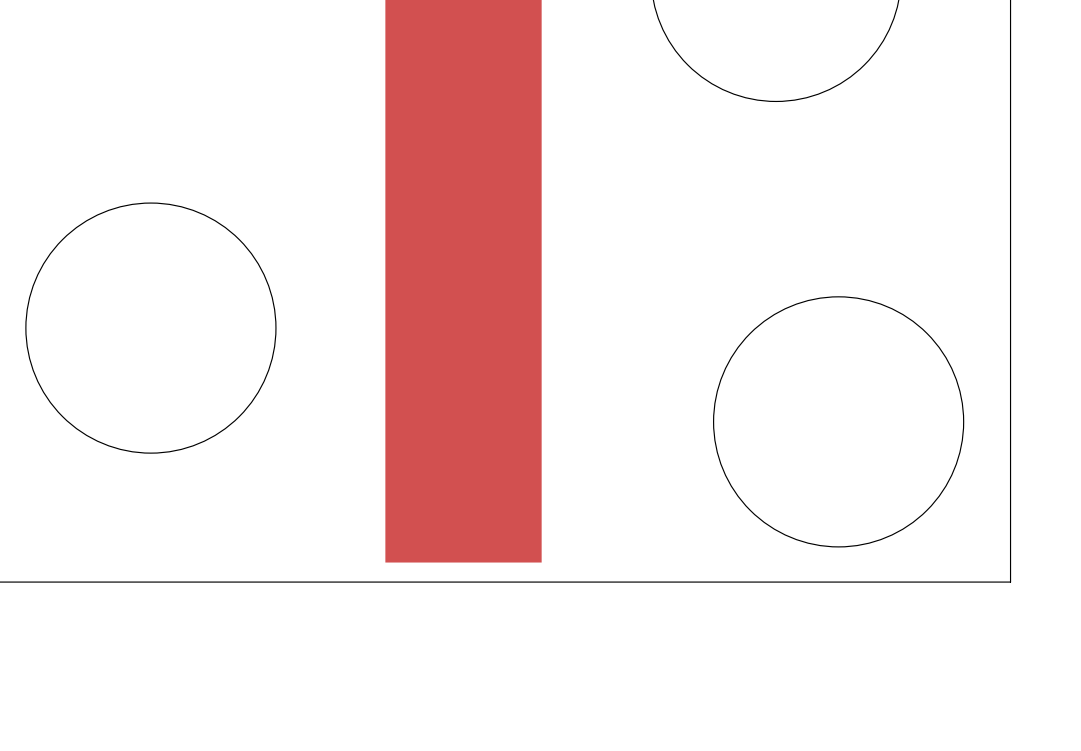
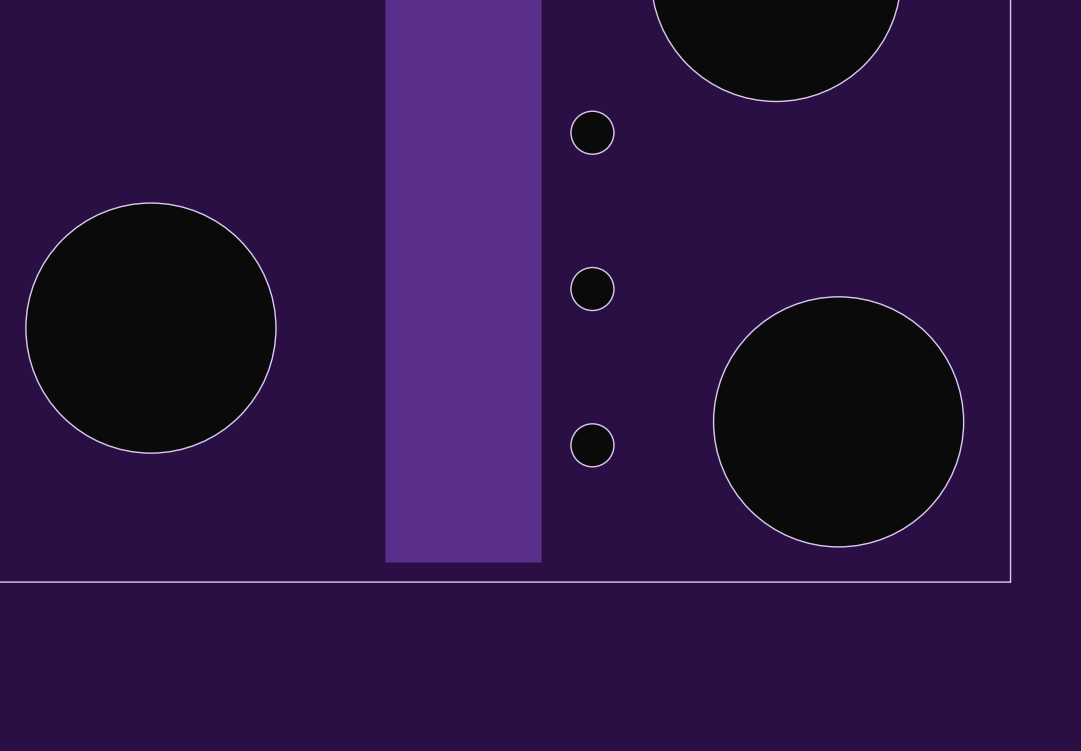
hole: none -> (592, 132)
hole: none -> (592, 289)
hole: none -> (592, 445)

